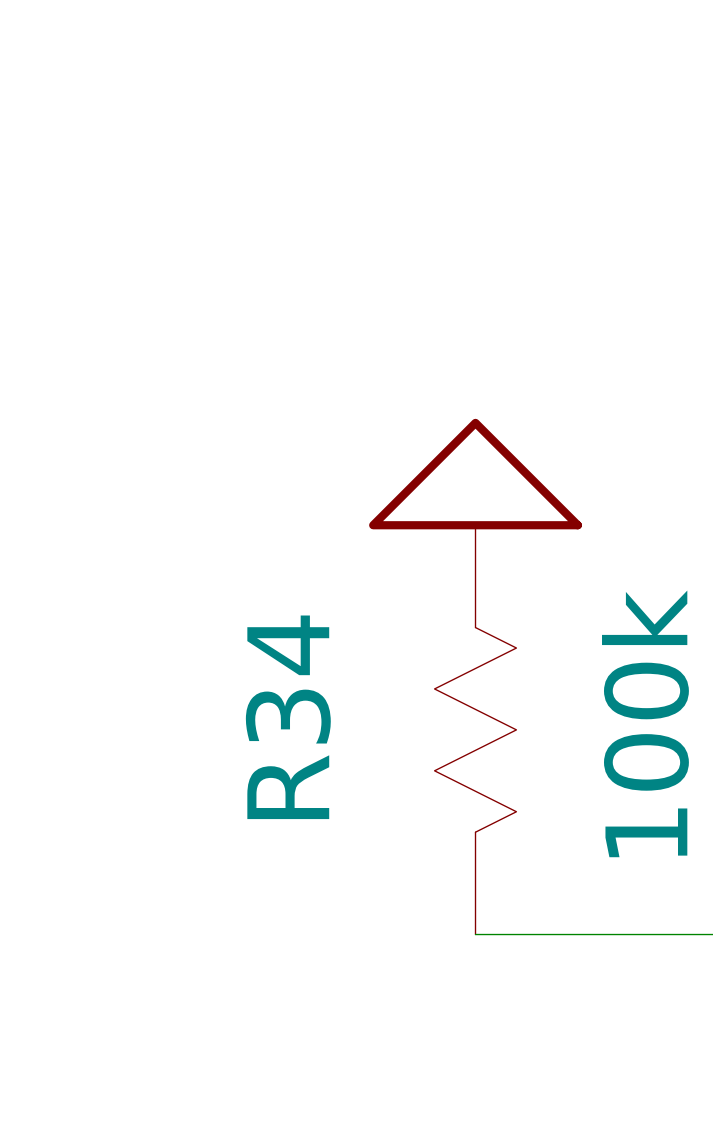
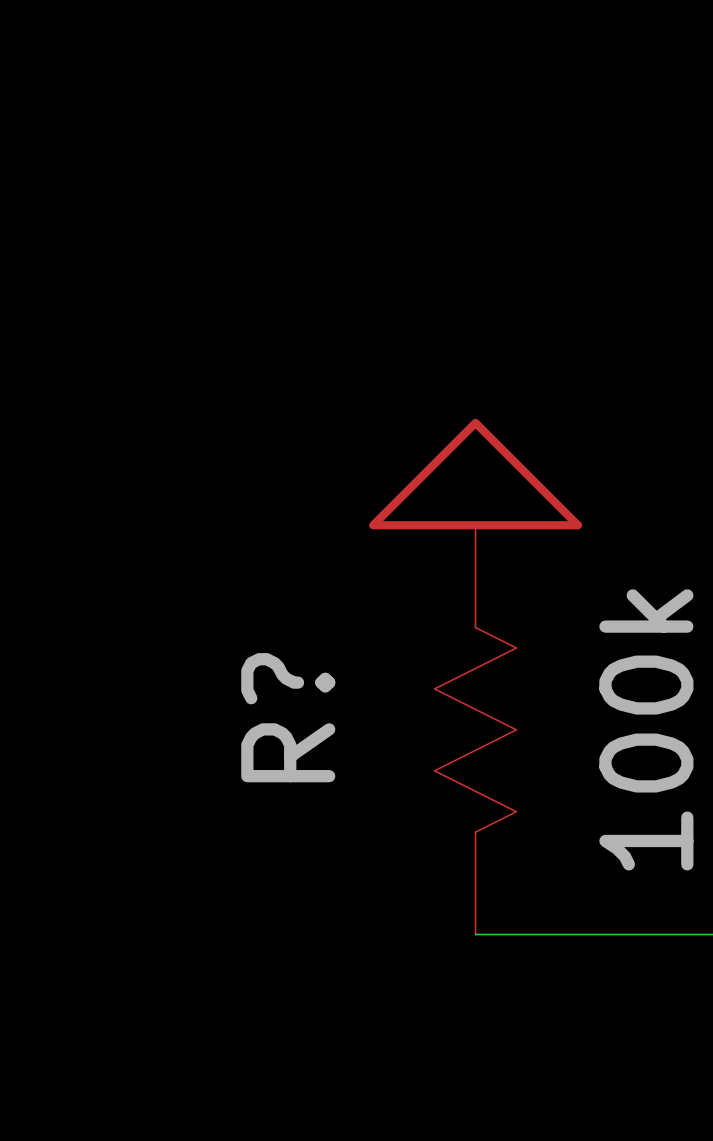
R34 name: R34 (288, 717) -> R? (288, 717)

